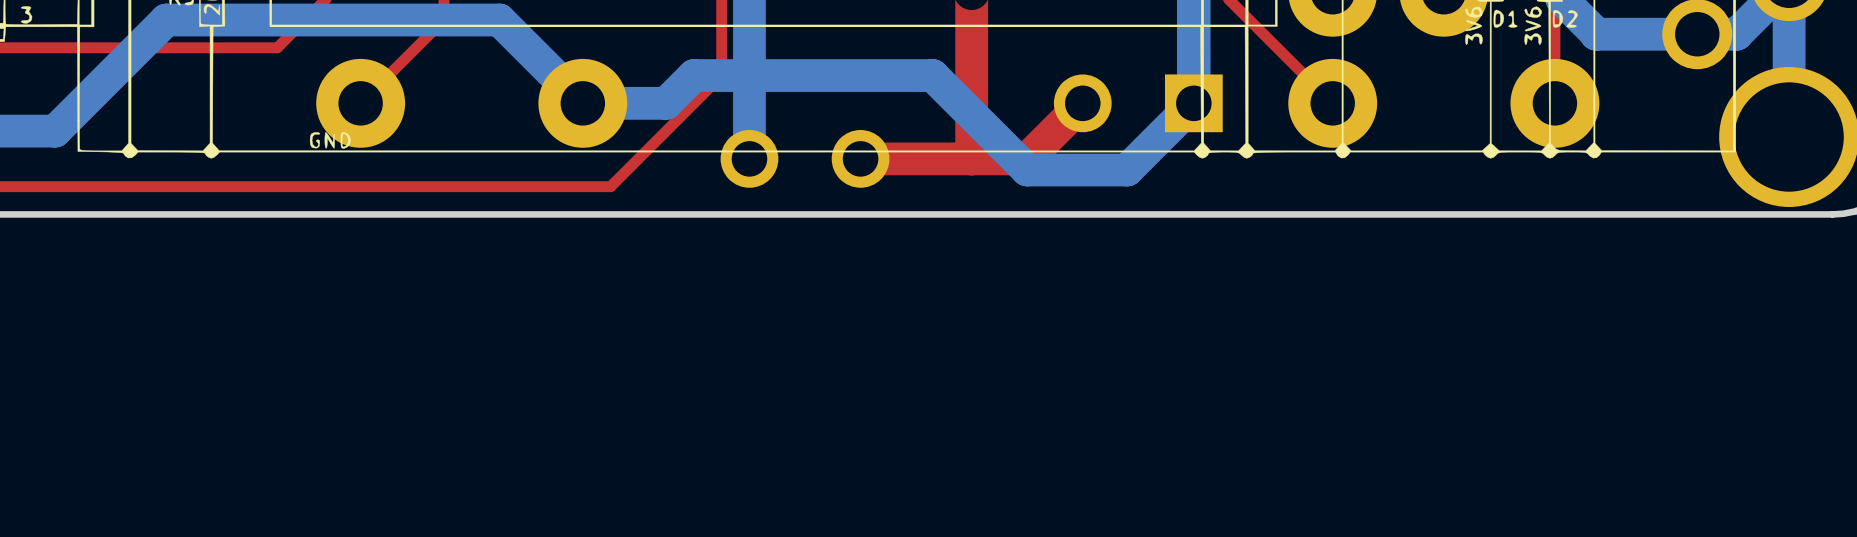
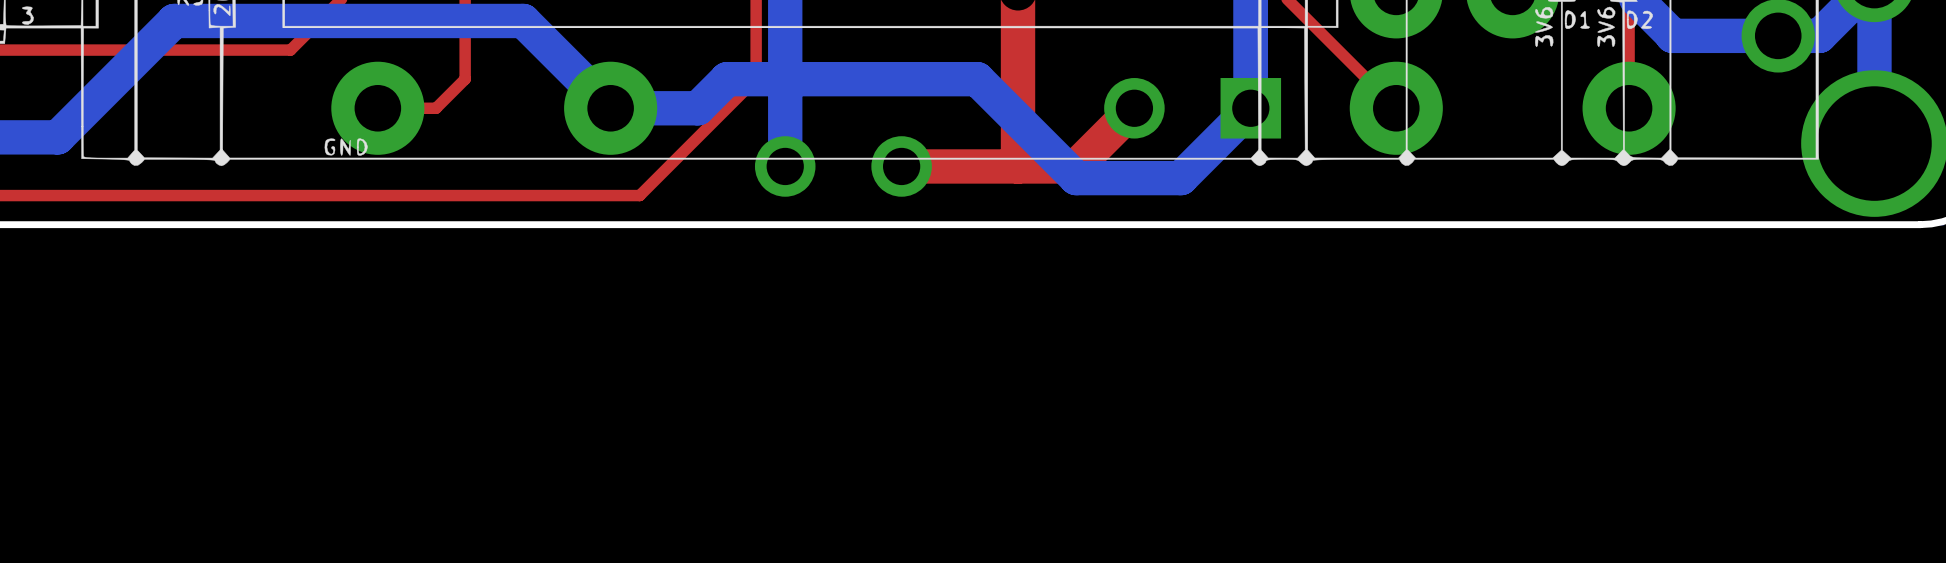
top track: (443, 20) (360, 103) -> (465, 20) (465, 79) (436, 108) (377, 108)

